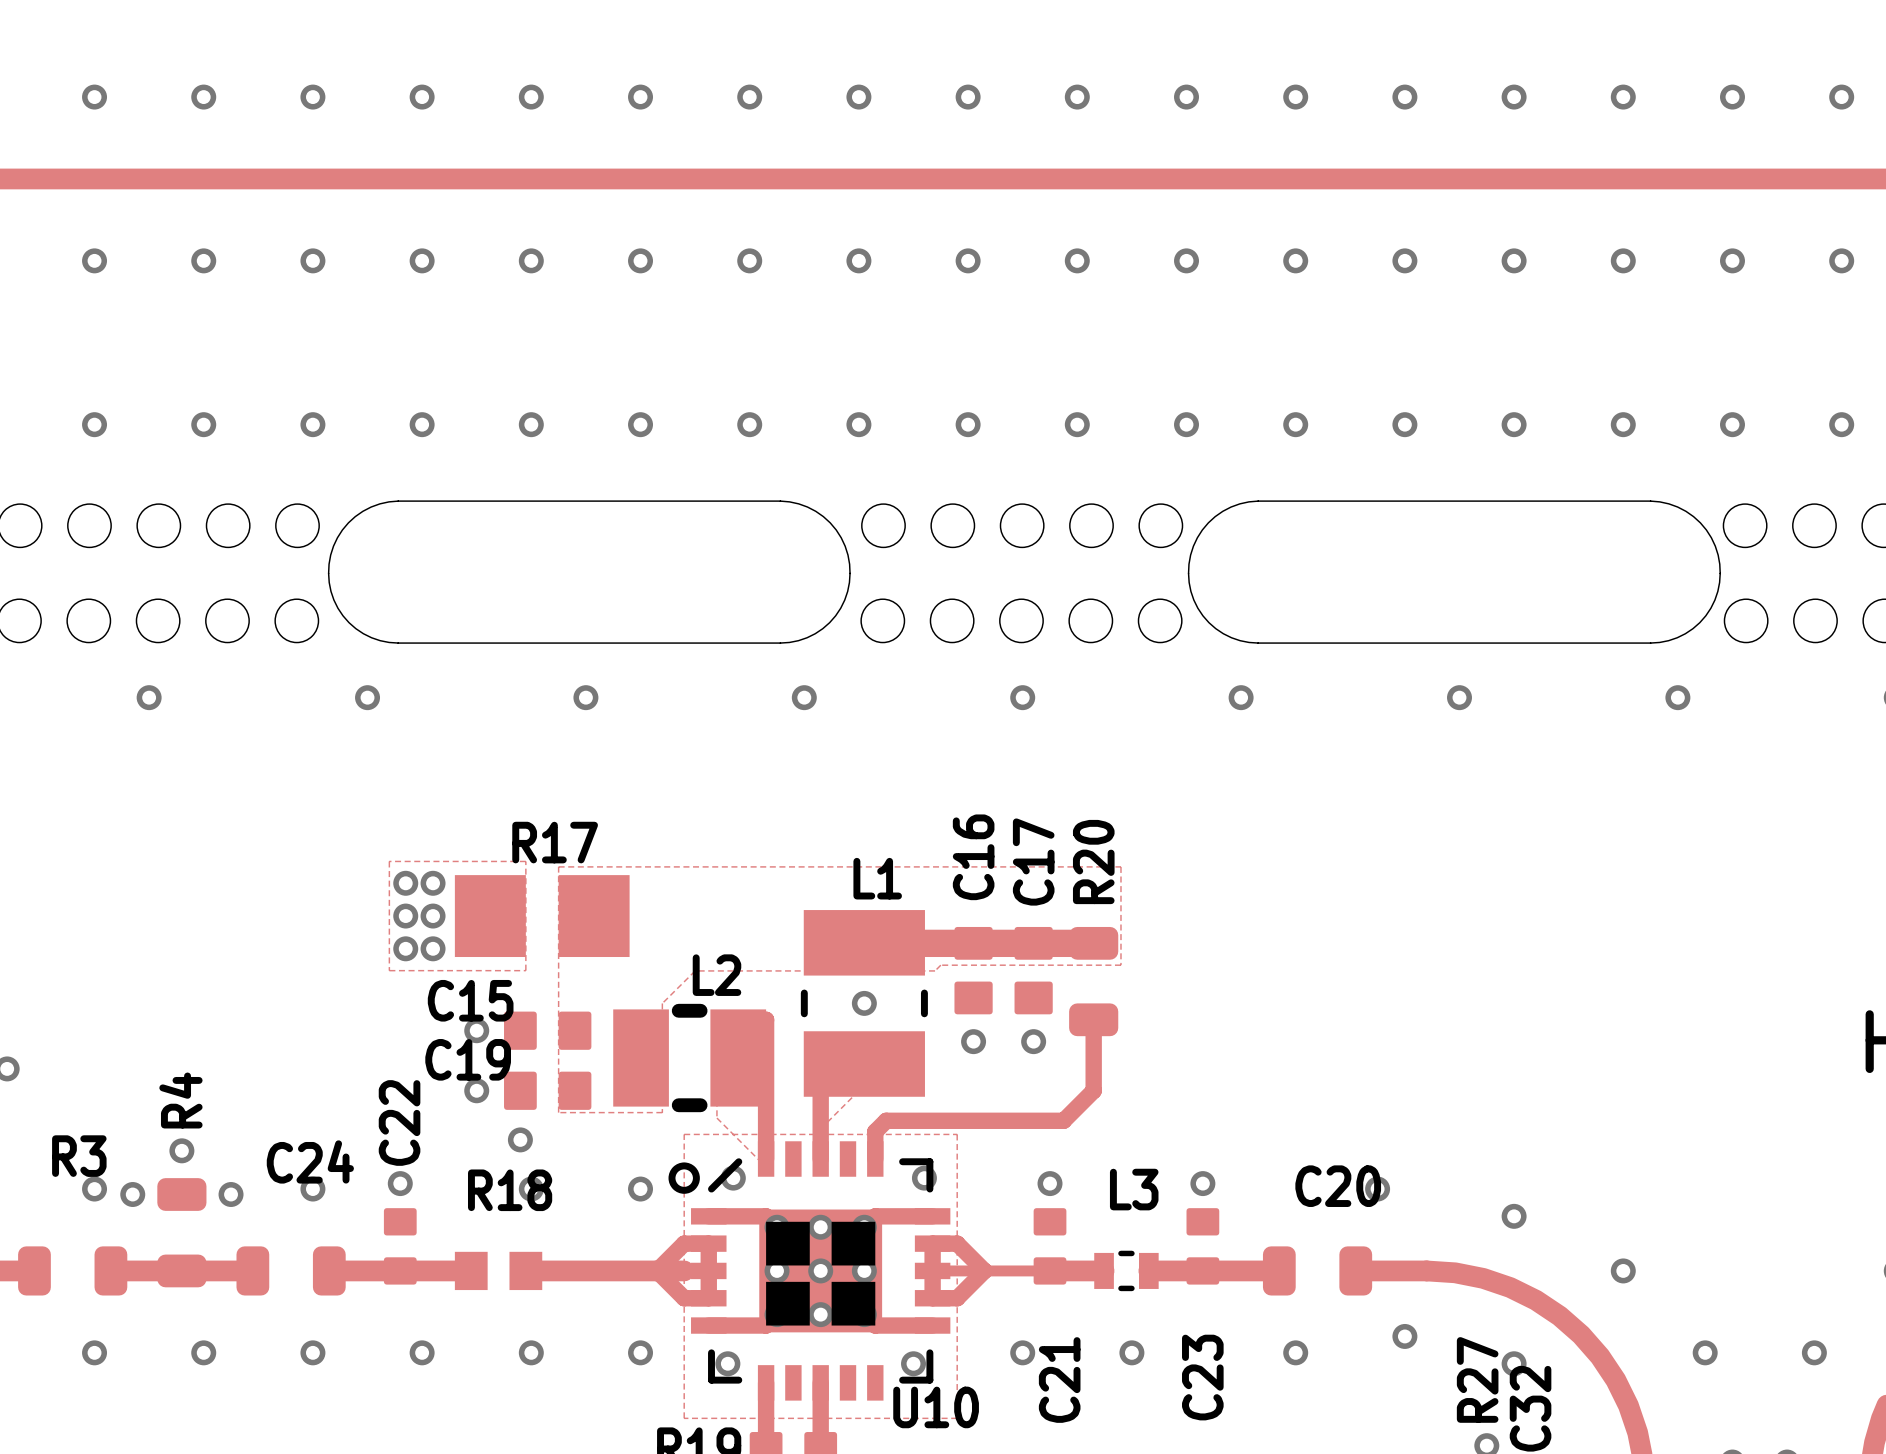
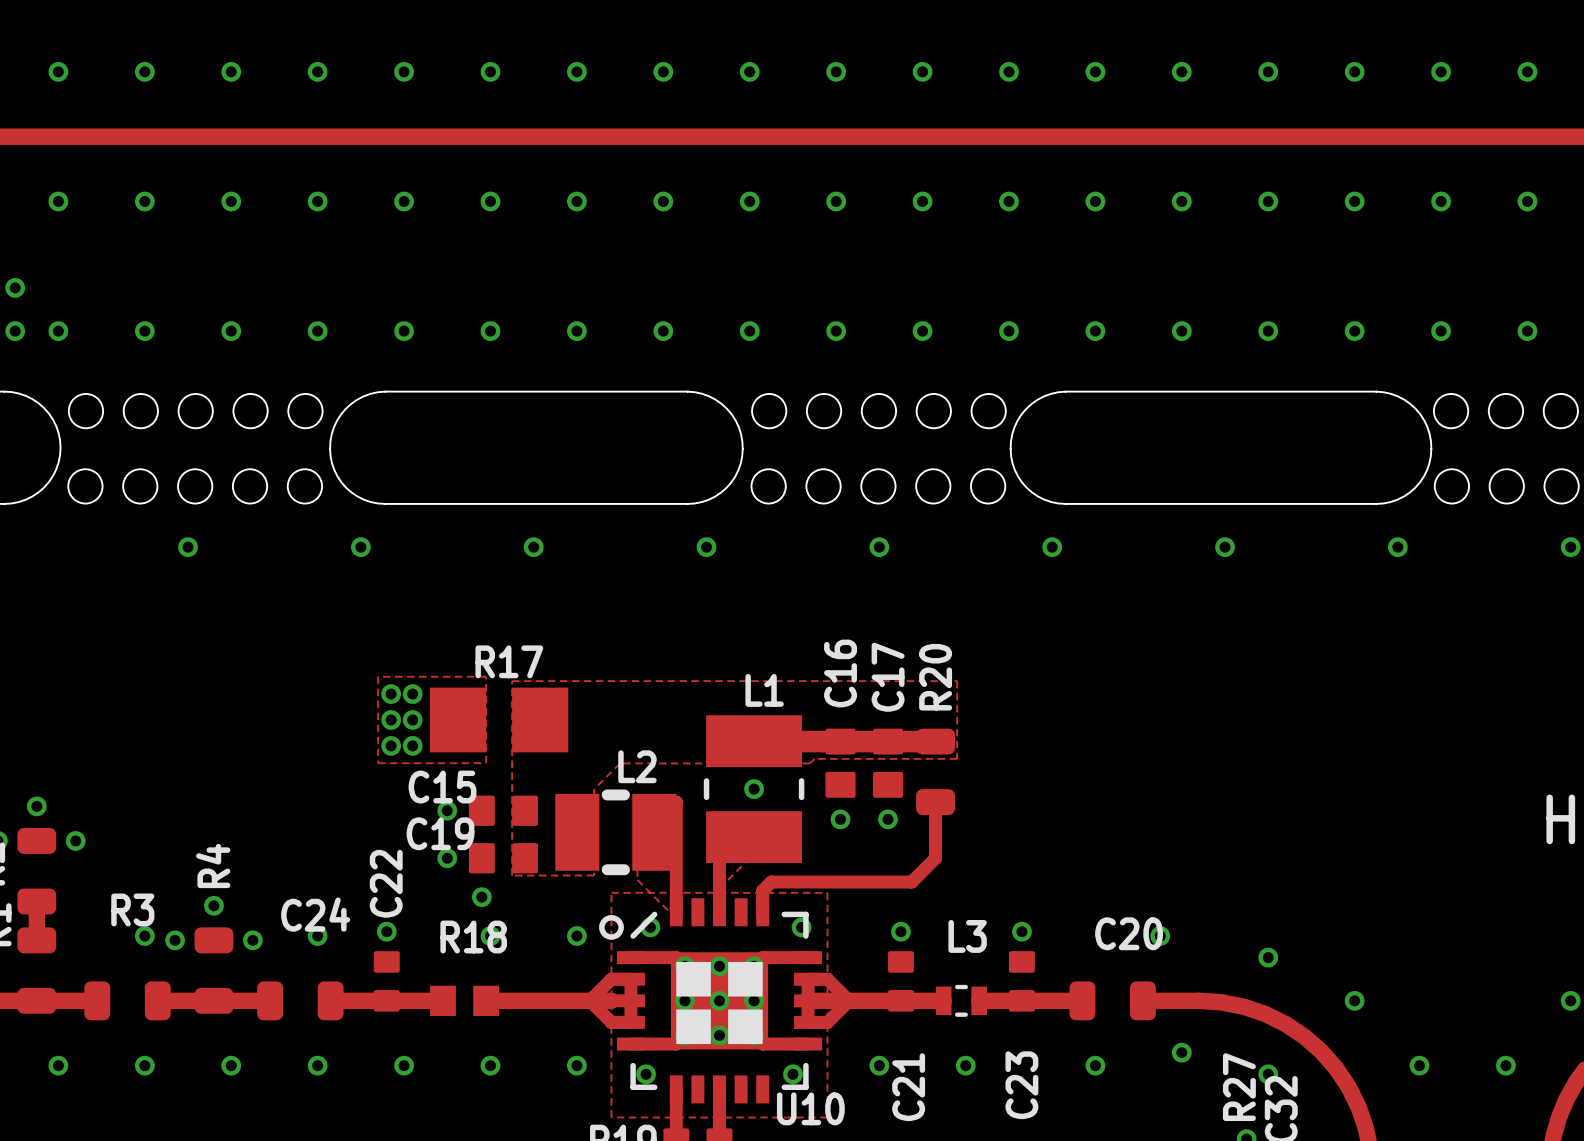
top track width: thin (932, 1270) (1050, 1270) -> thick (808, 1000) (900, 1000)

